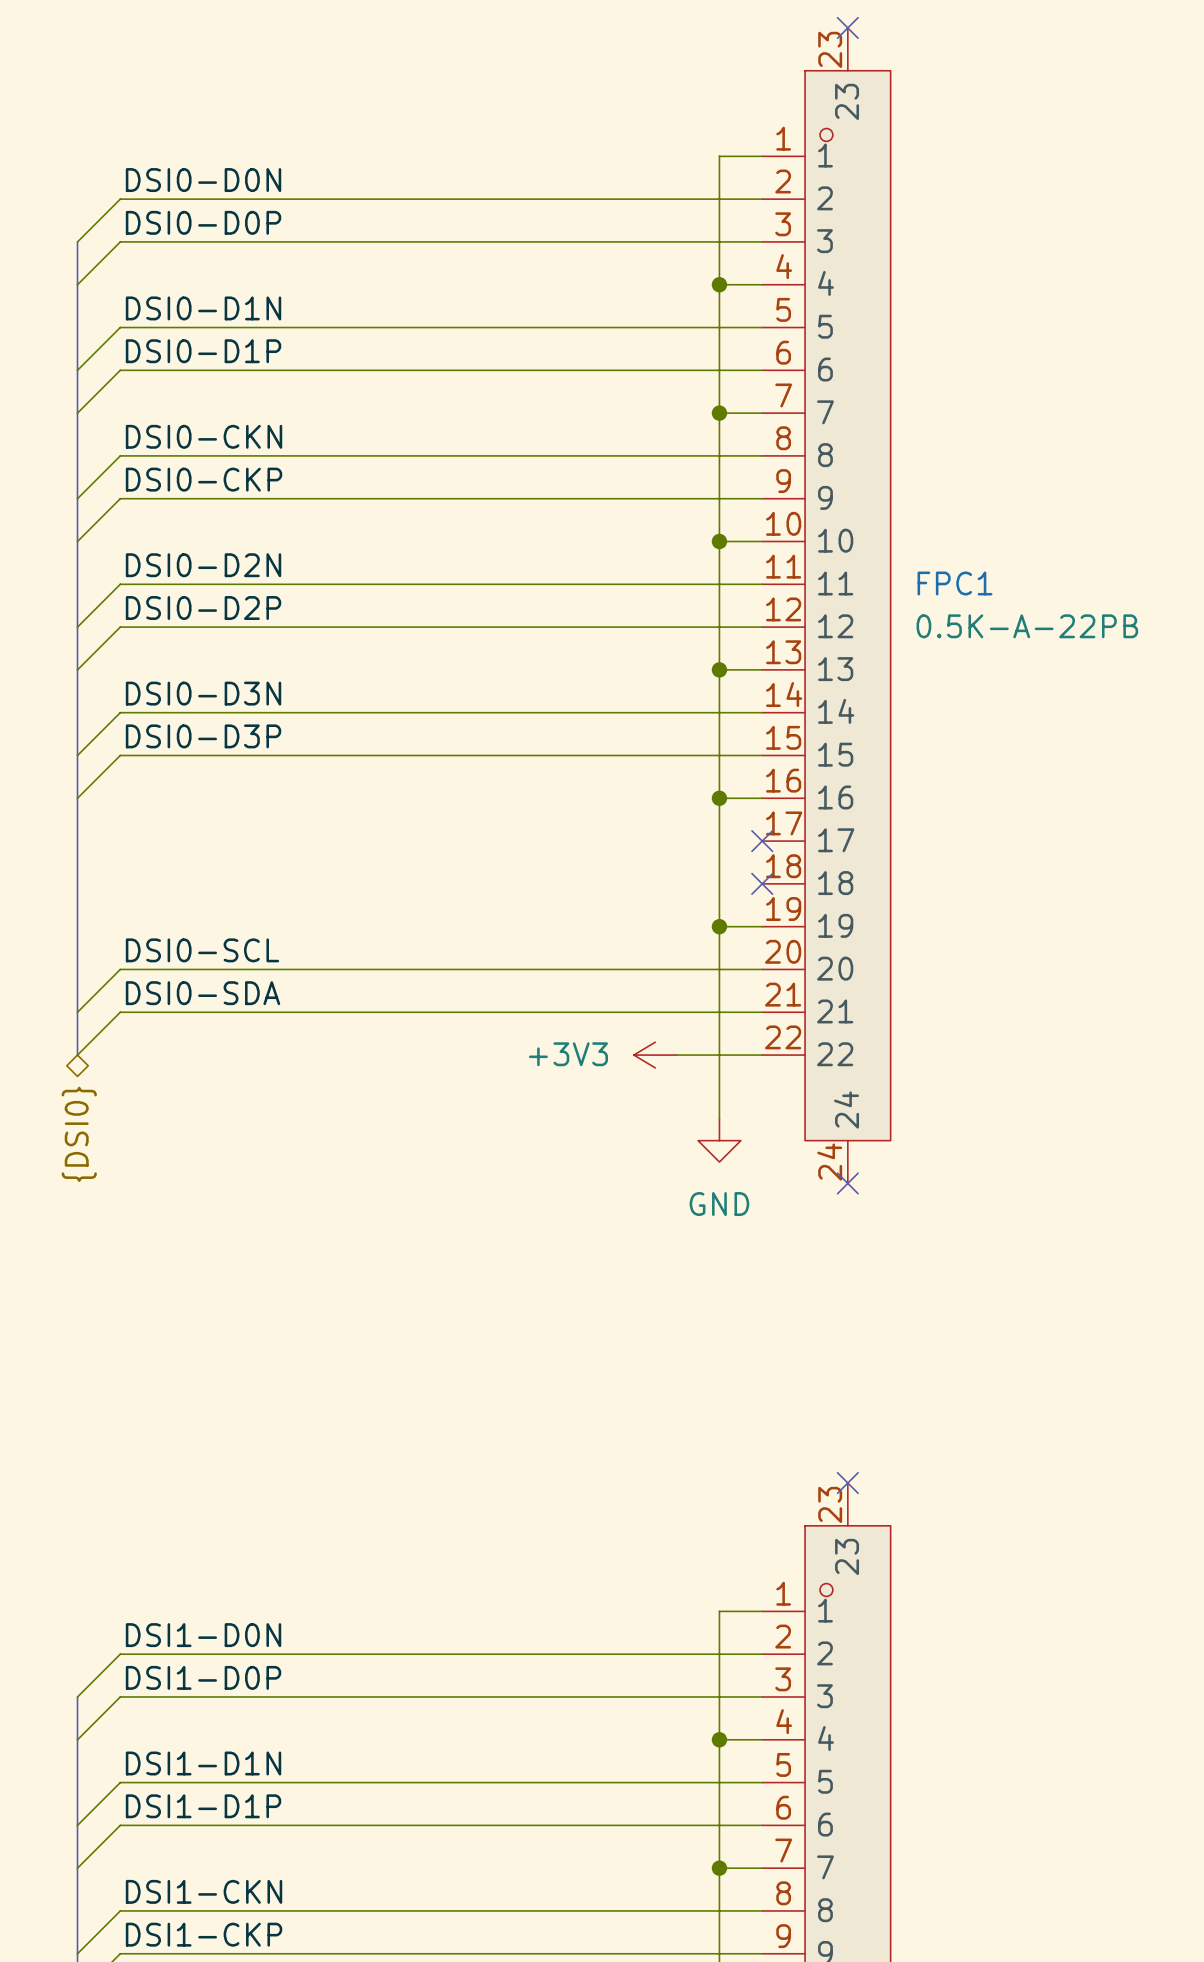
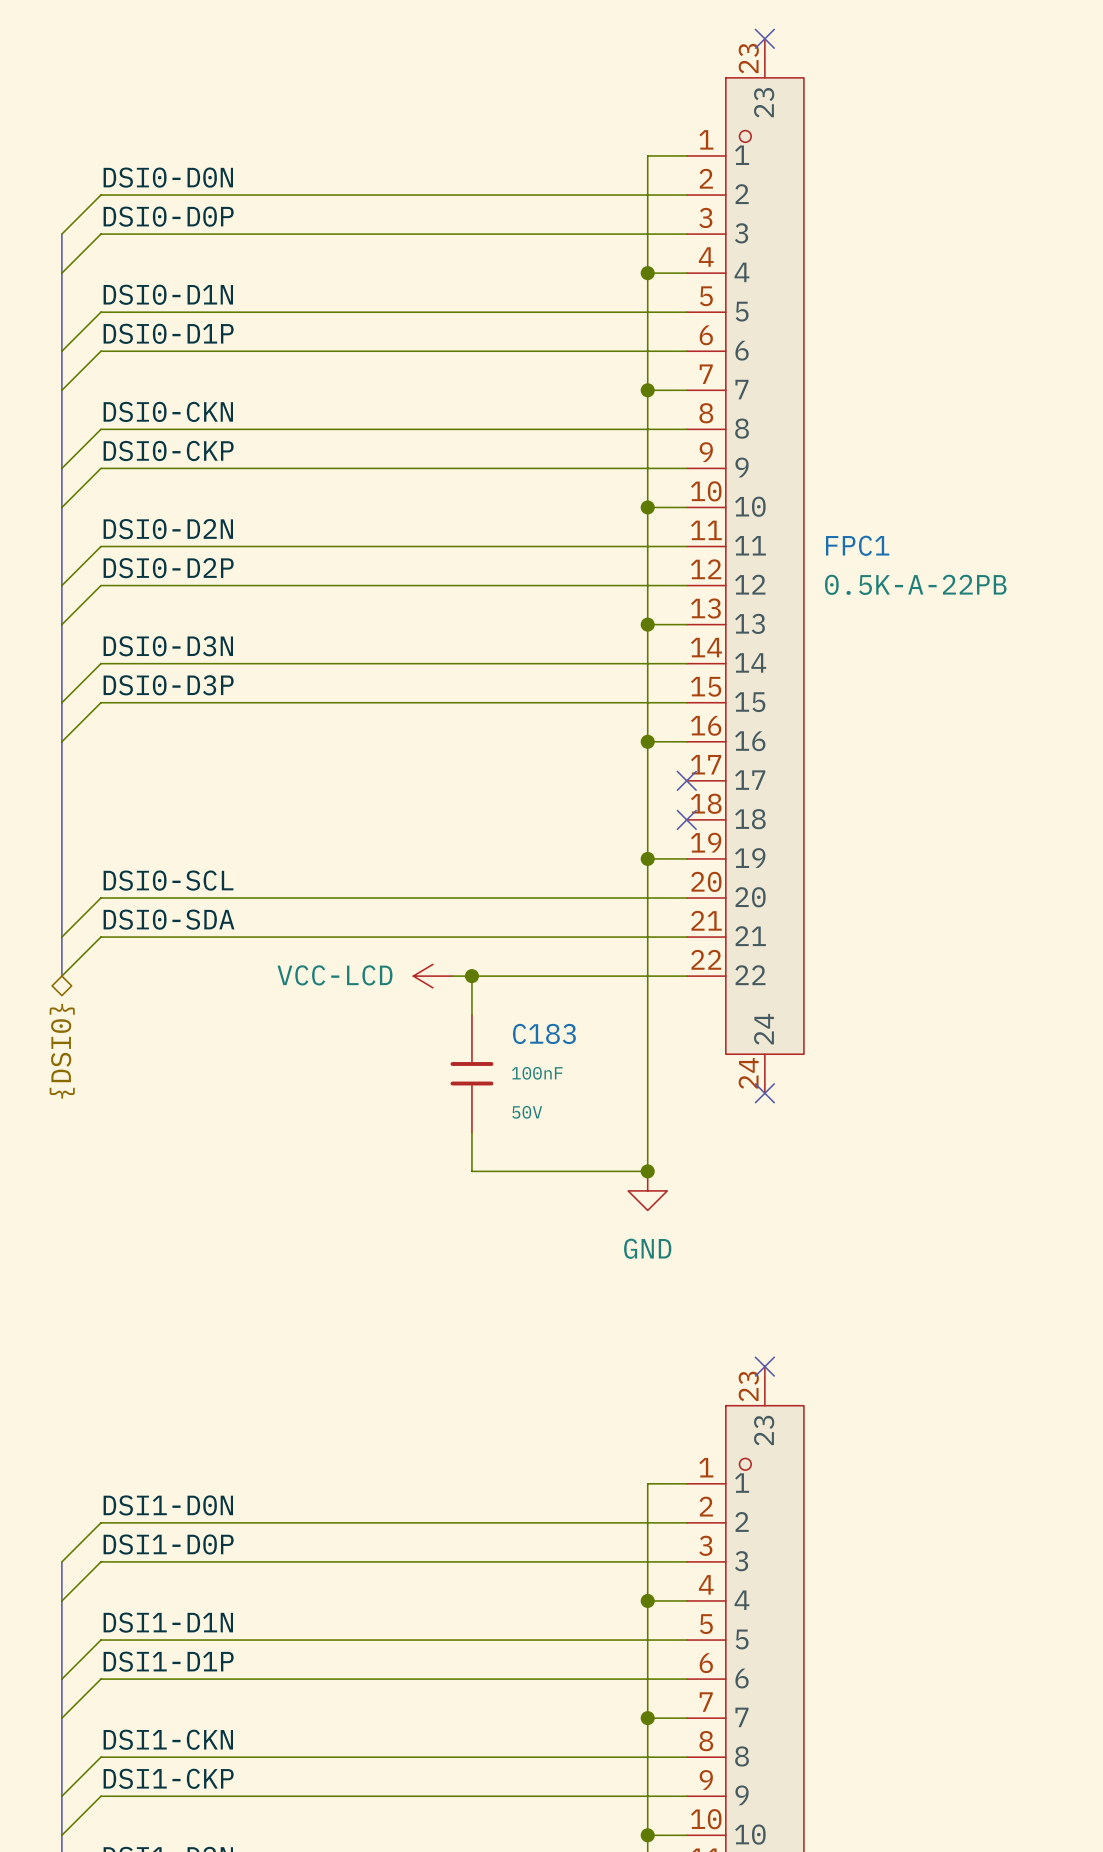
power symbol: none -> VCC-LCD (432, 976)
wire: none -> (452, 976) (608, 976)
wire: none -> (471, 976) (471, 1015)
junction: none -> (471, 976)
power symbol: +3V3 (655, 1055) -> none
wire: none -> (647, 1034) (647, 1171) (471, 1171) (471, 1132)
power symbol position: GND (719, 1140) -> GND (647, 1190)
C183: none -> 100nF (471, 1073)
junction: none -> (647, 1171)

